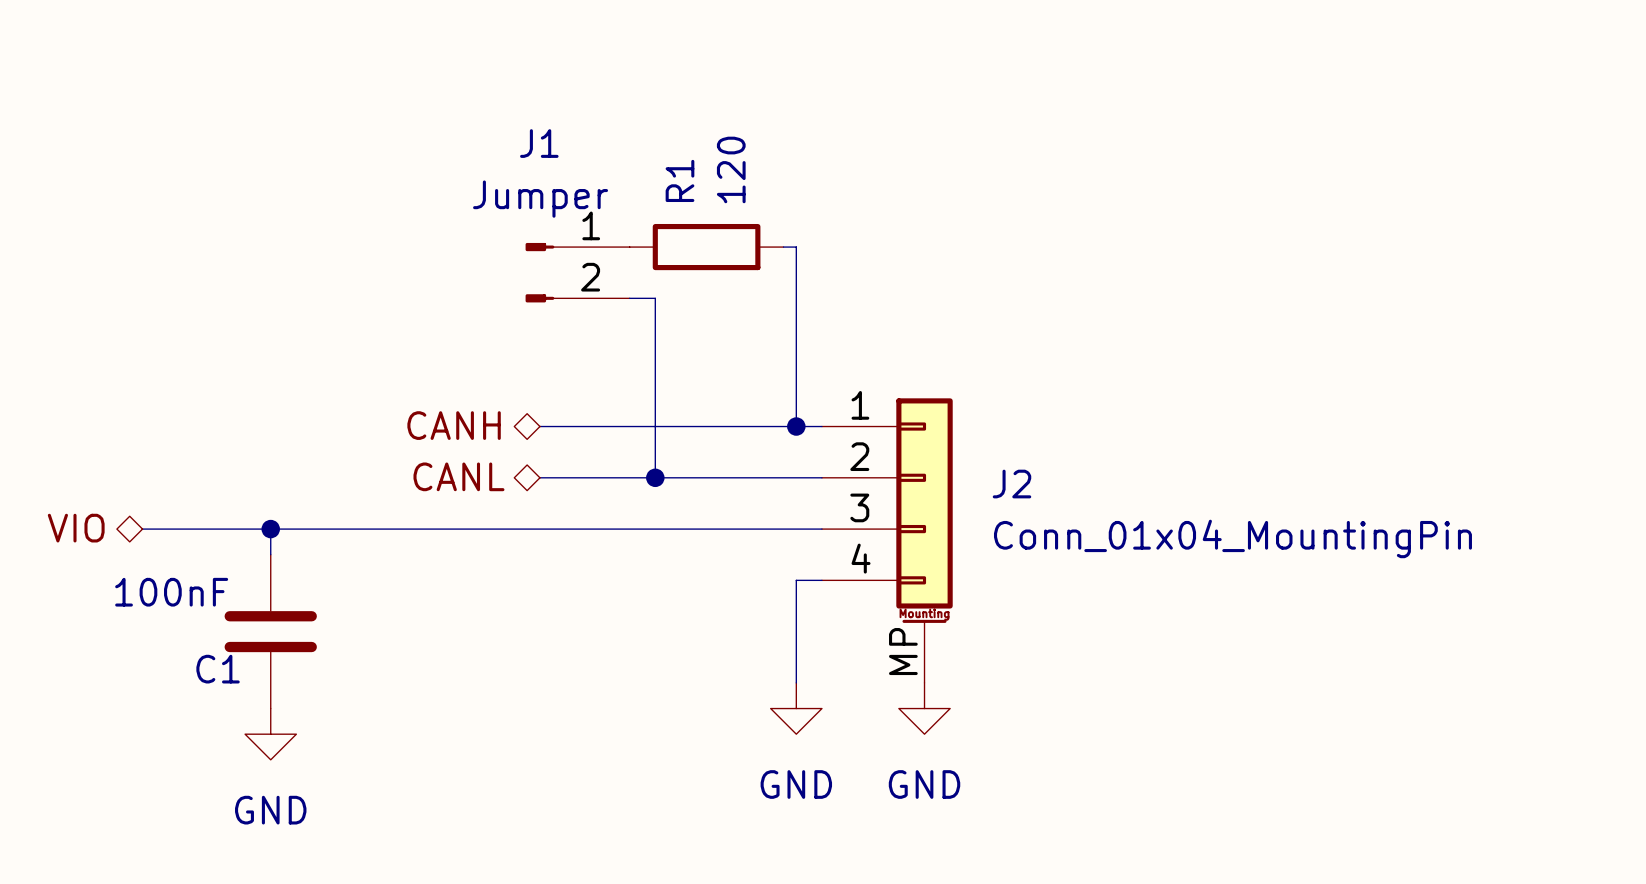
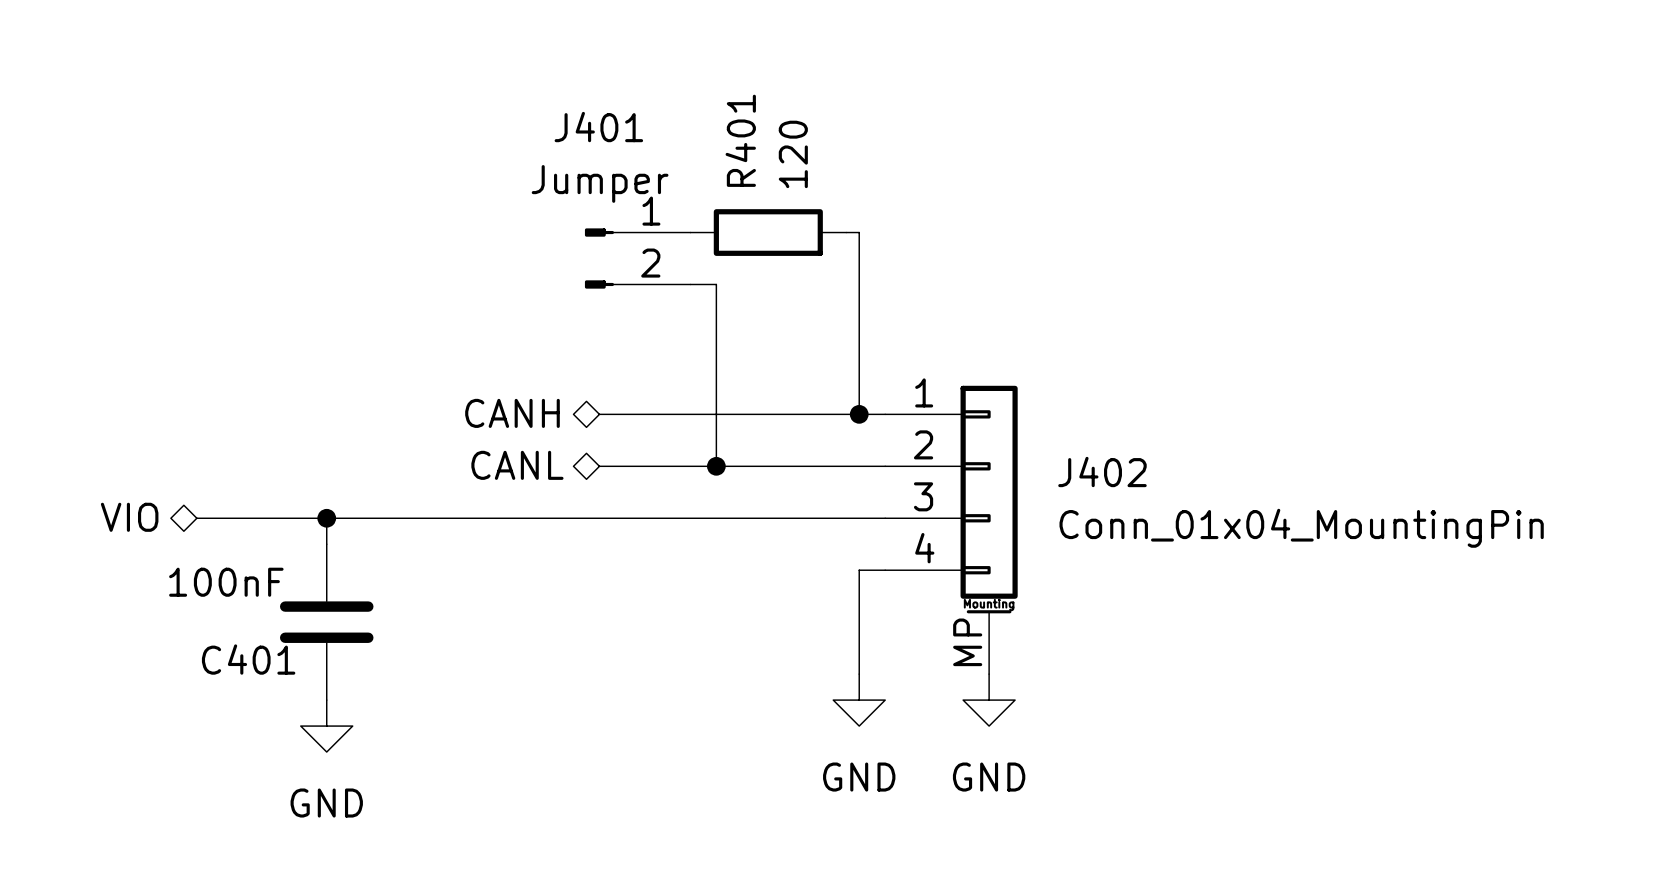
J1 name: J1 (539, 143) -> J401 (598, 127)
R1 name: R1 (679, 180) -> R401 (740, 140)
J2 name: J2 (1012, 484) -> J402 (1102, 471)
C1 name: C1 (218, 669) -> C401 (248, 659)

